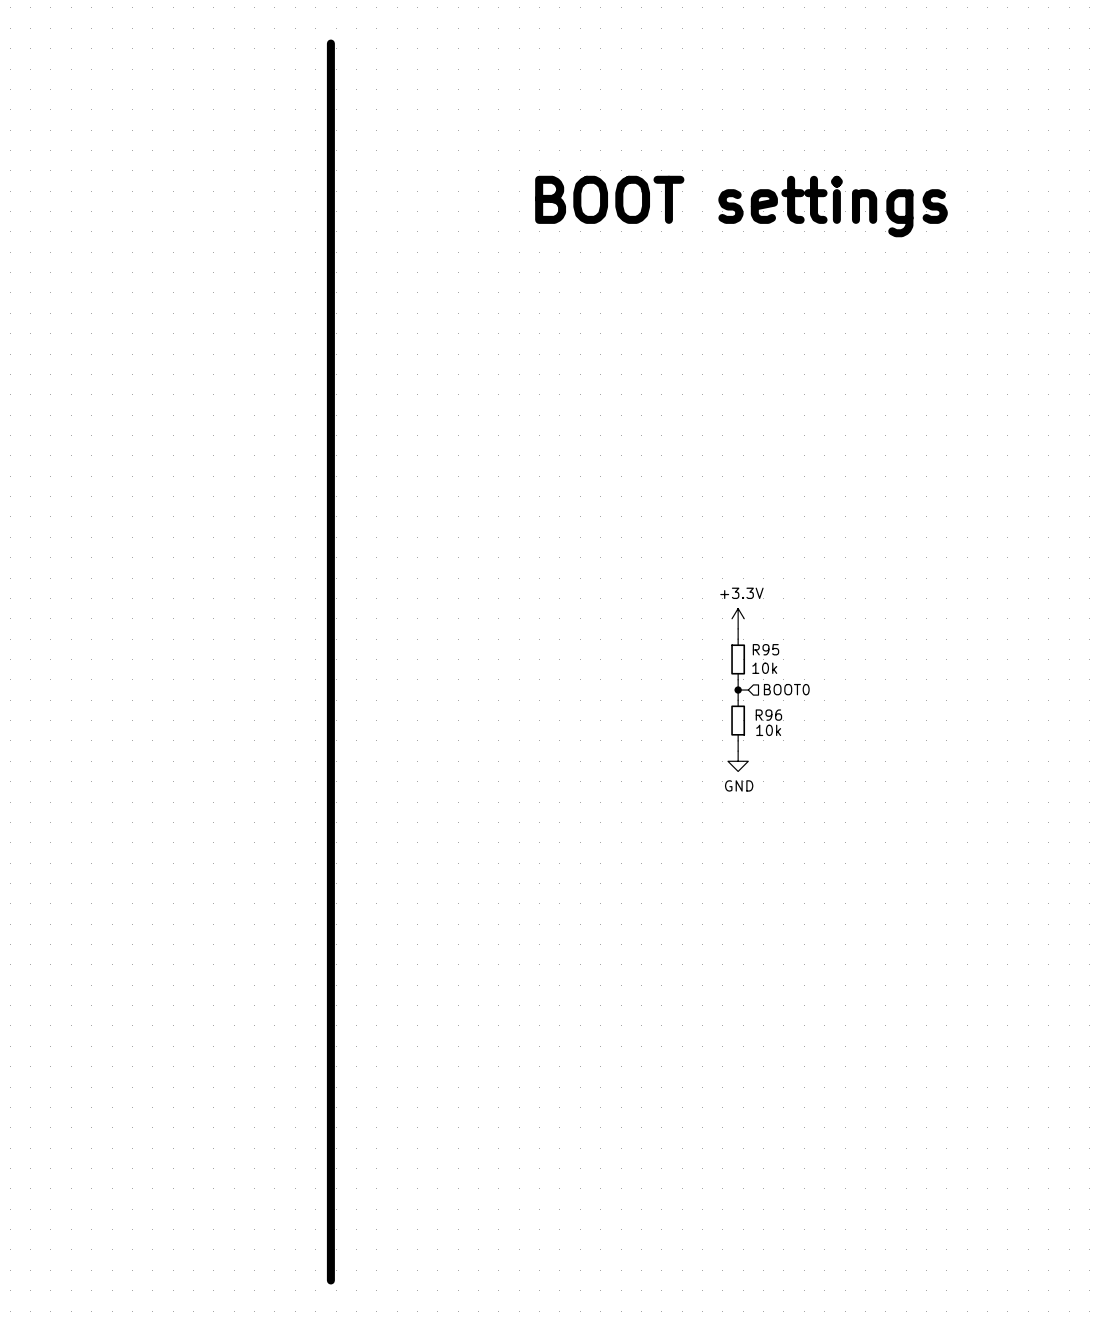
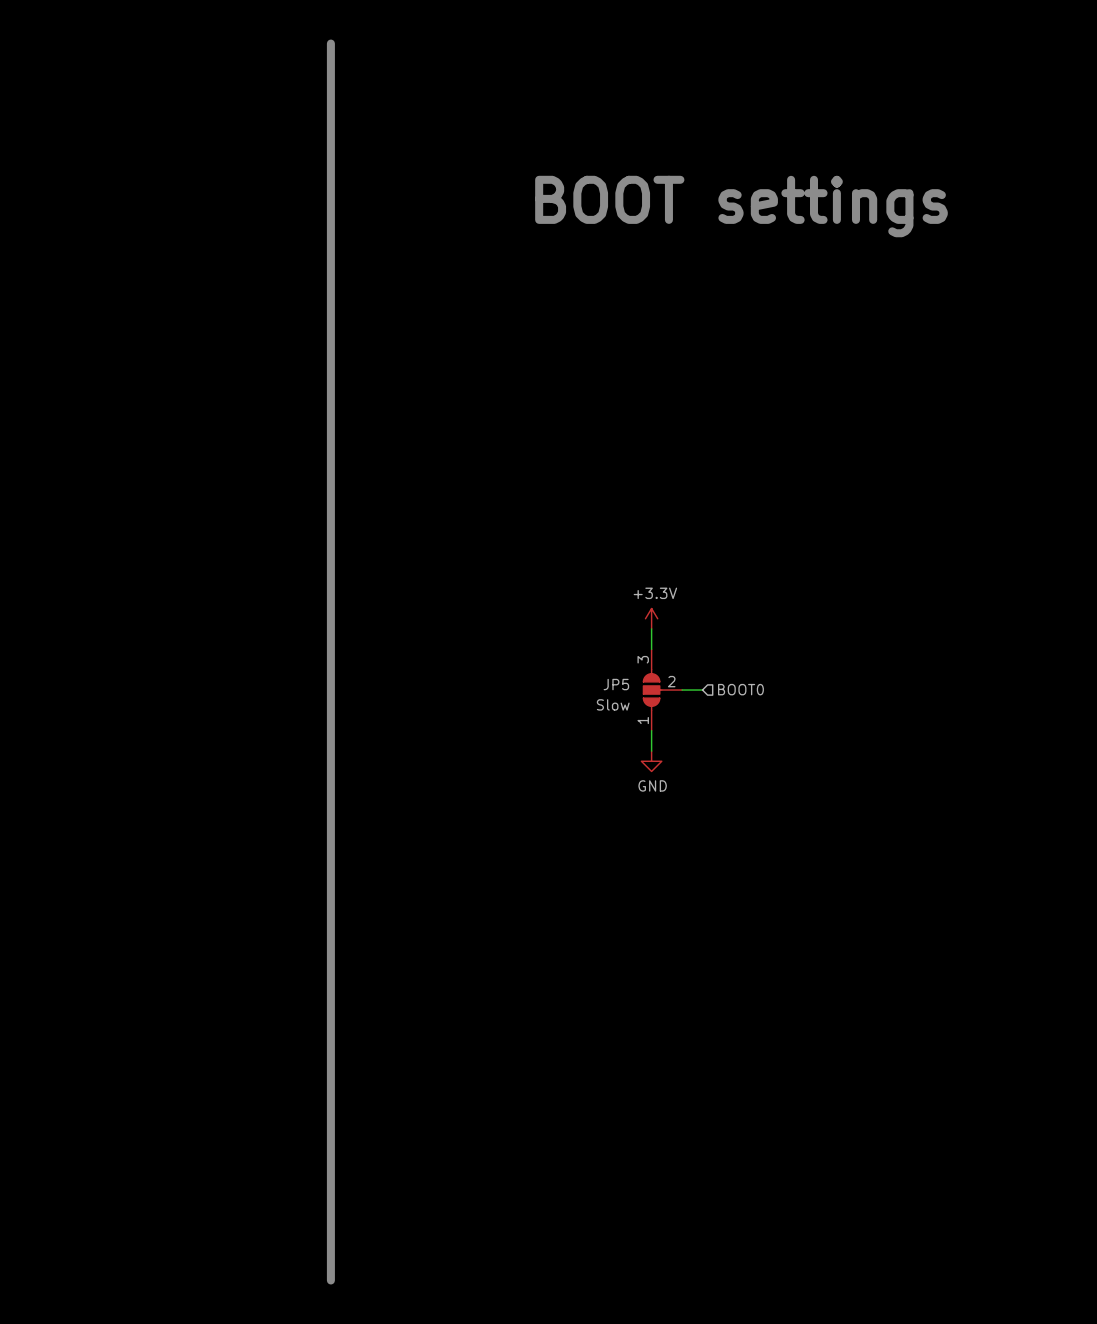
power symbol position: +3.3V (738, 618) -> +3.3V (651, 618)
wire: (738, 628) (738, 639) -> none
R95: 10k (738, 659) -> none
wire: (738, 679) (738, 700) -> (651, 628) (651, 649)
hierarchical label position: BOOT0 (786, 689) -> BOOT0 (740, 689)
JP5: none -> Slow (662, 690)
wire: none -> (682, 690) (702, 690)
wire: (738, 690) (748, 690) -> none
junction: (738, 690) -> none
R96: 10k (738, 720) -> none
wire: none -> (651, 730) (651, 751)
wire: (738, 740) (738, 751) -> none
power symbol position: GND (738, 761) -> GND (651, 761)

